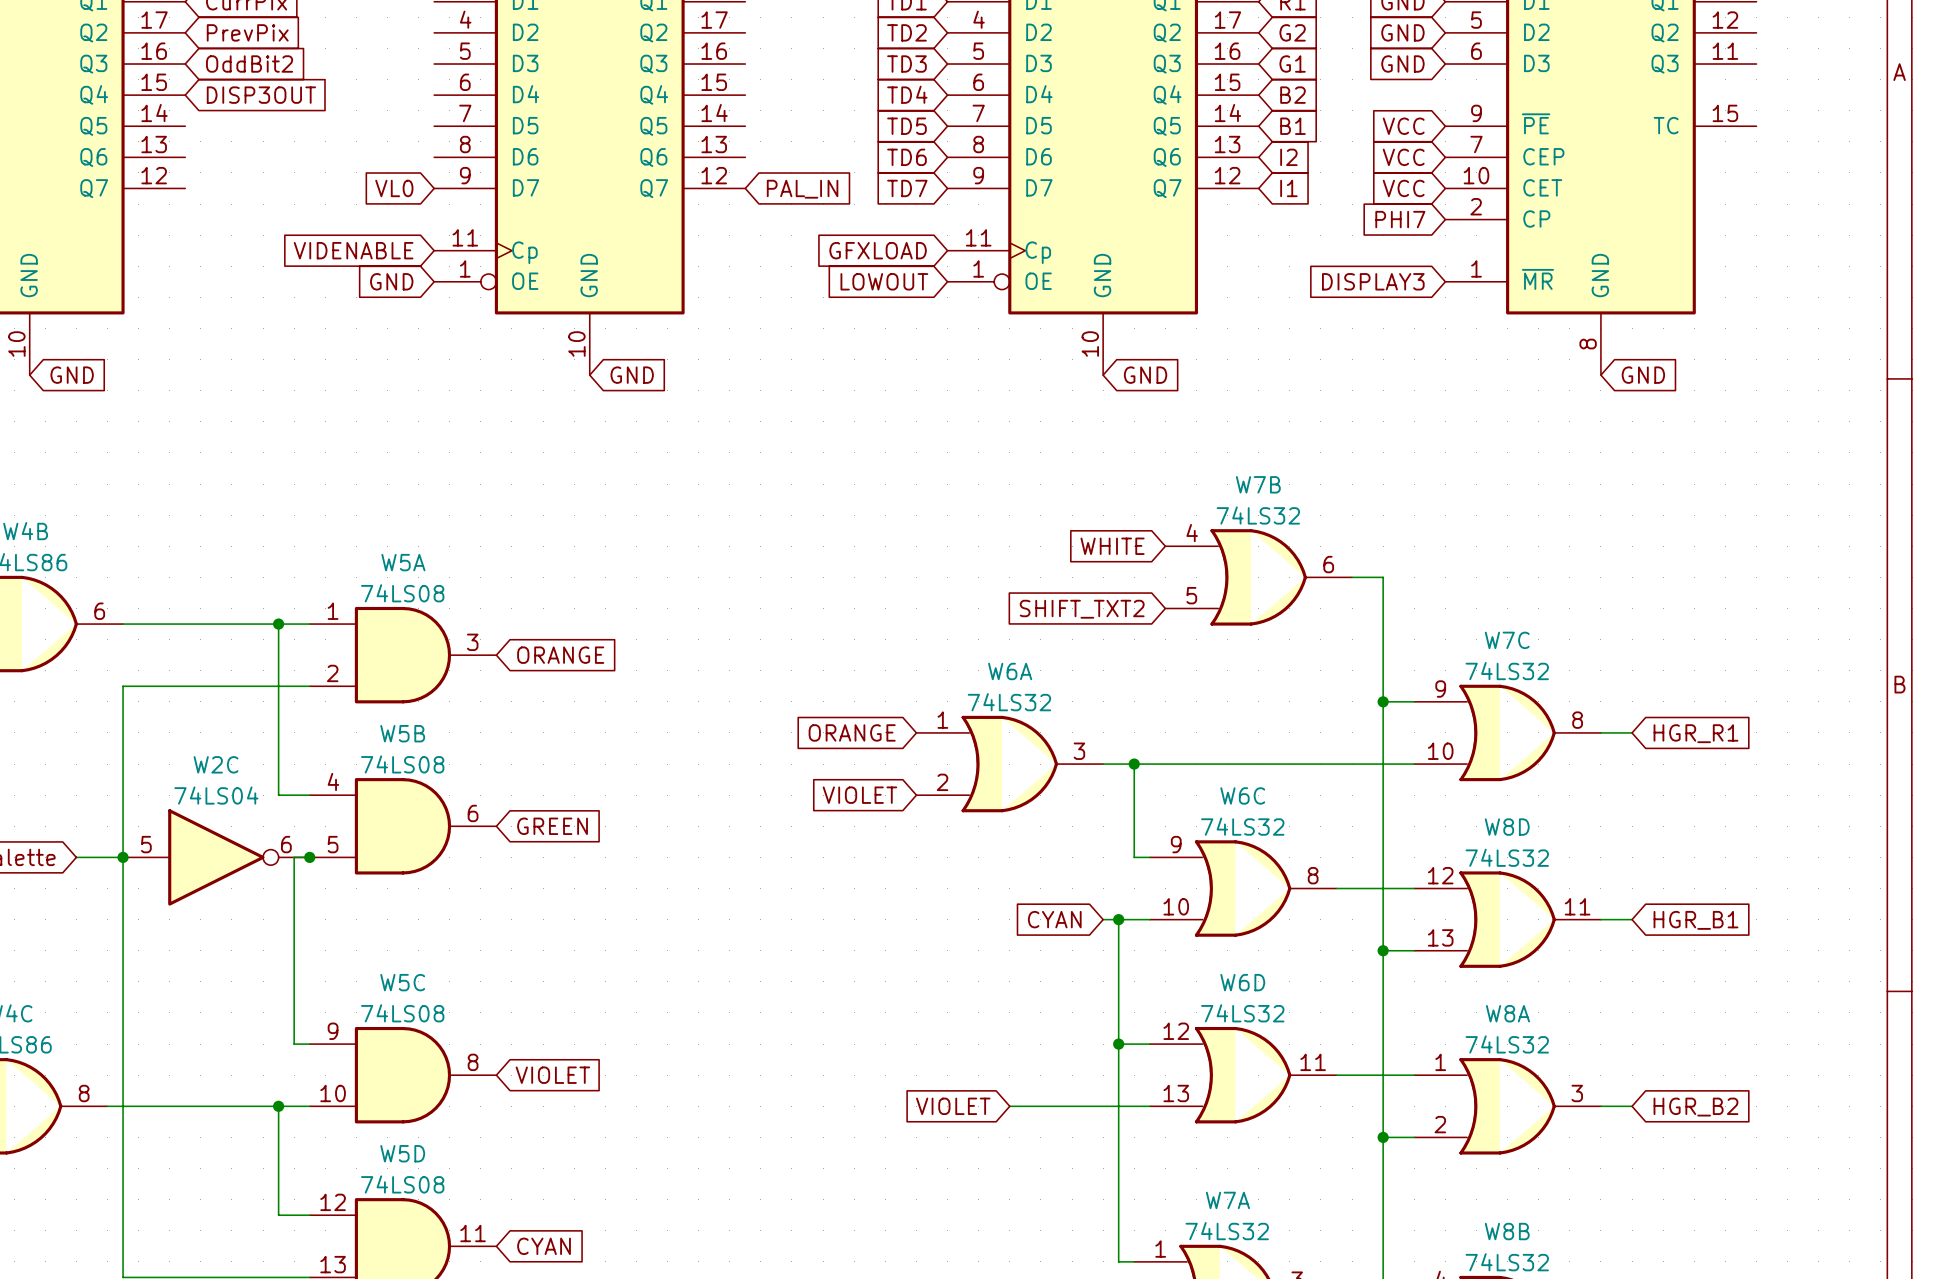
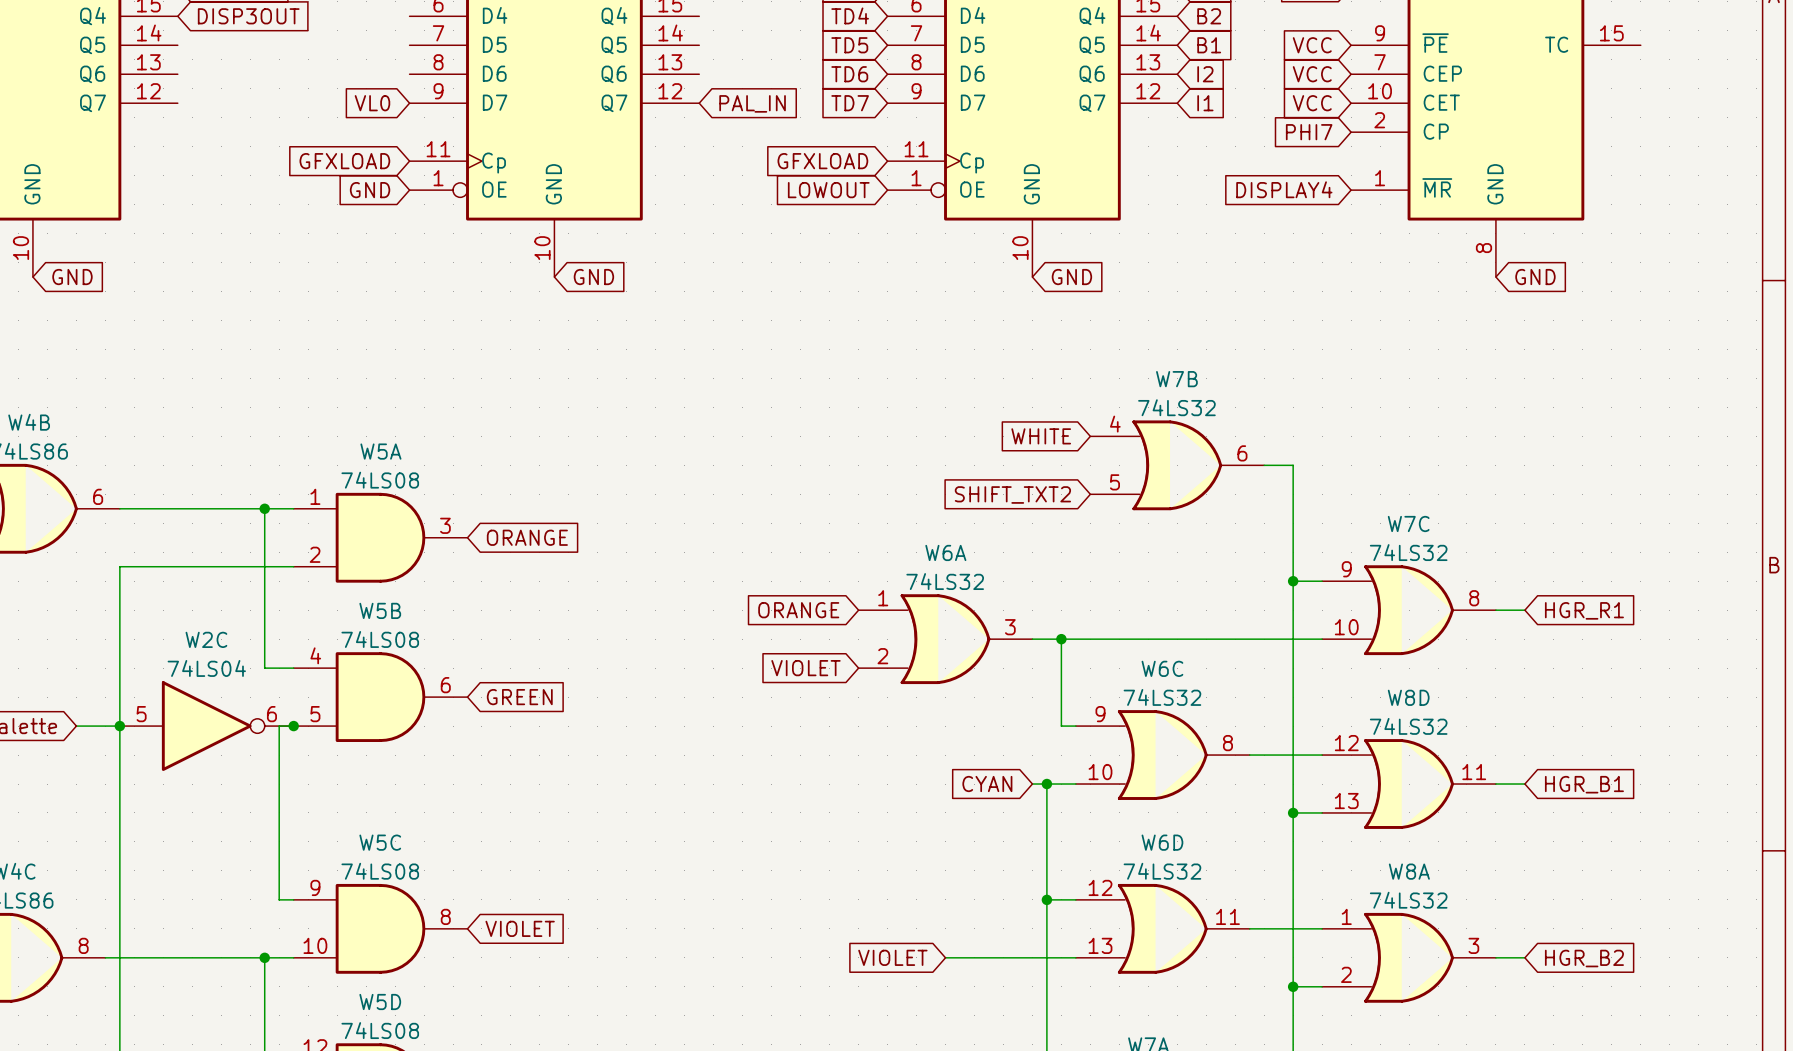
global label: VIDENABLE (353, 250) -> GFXLOAD (344, 161)
global label: DISPLAY3 (1373, 281) -> DISPLAY4 (1284, 189)

